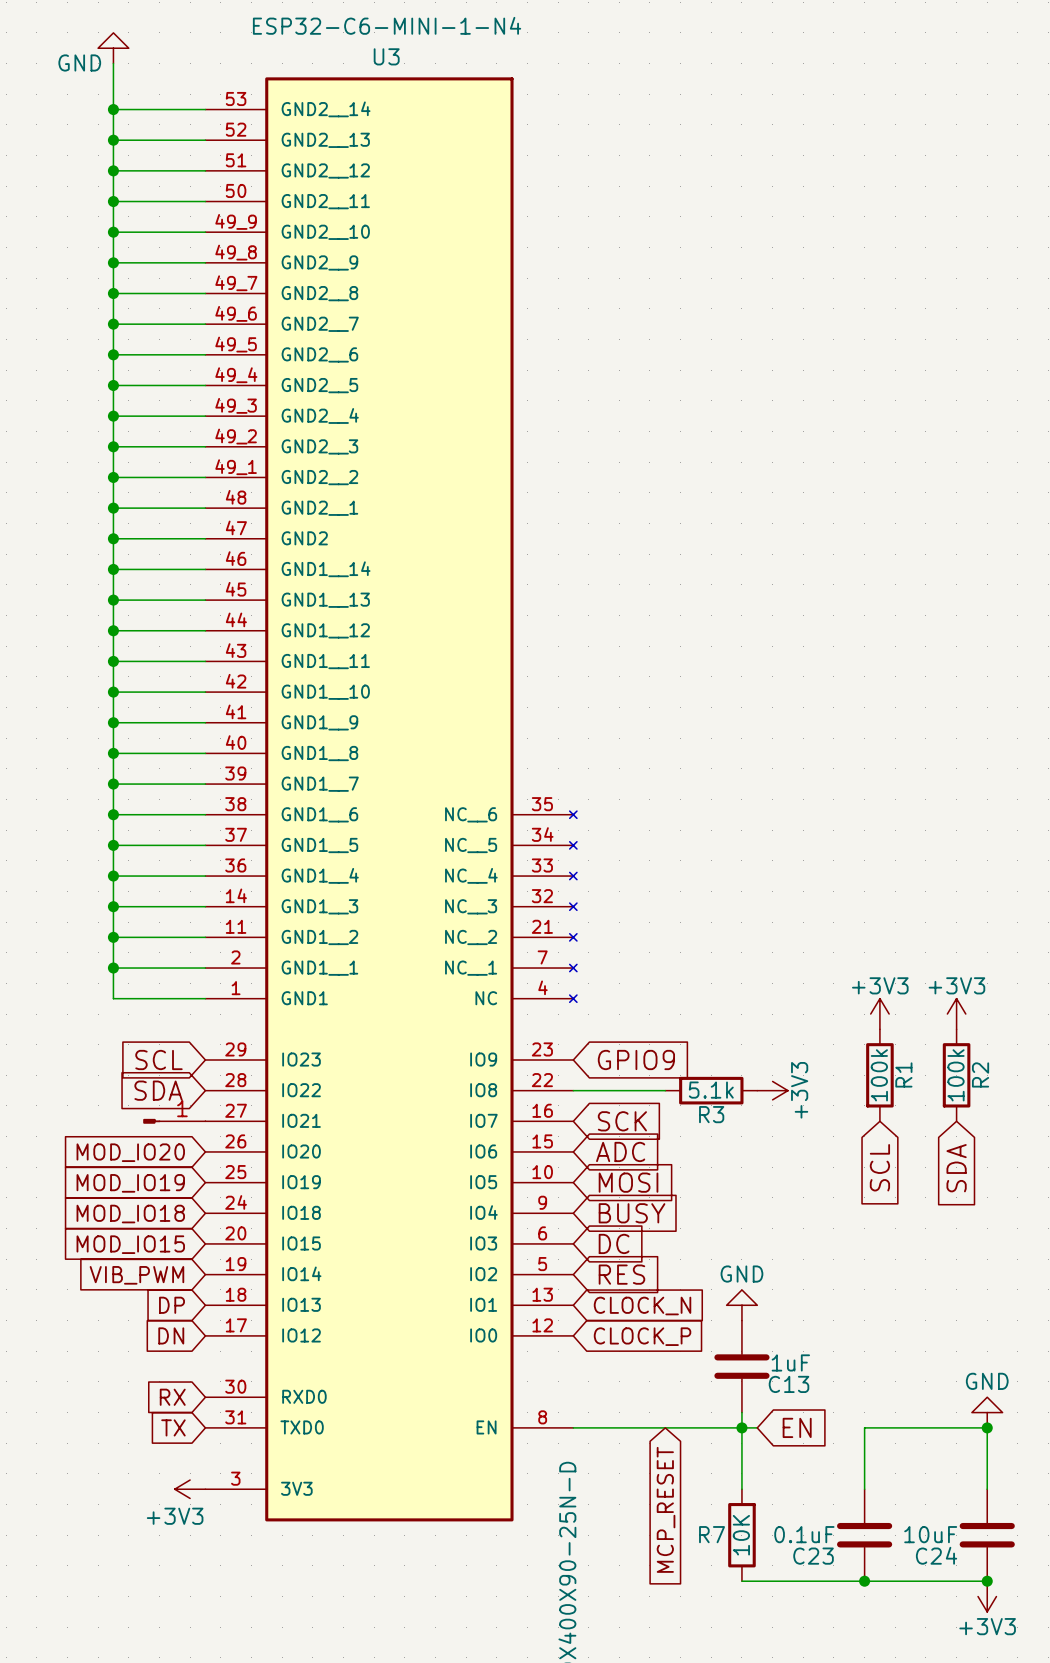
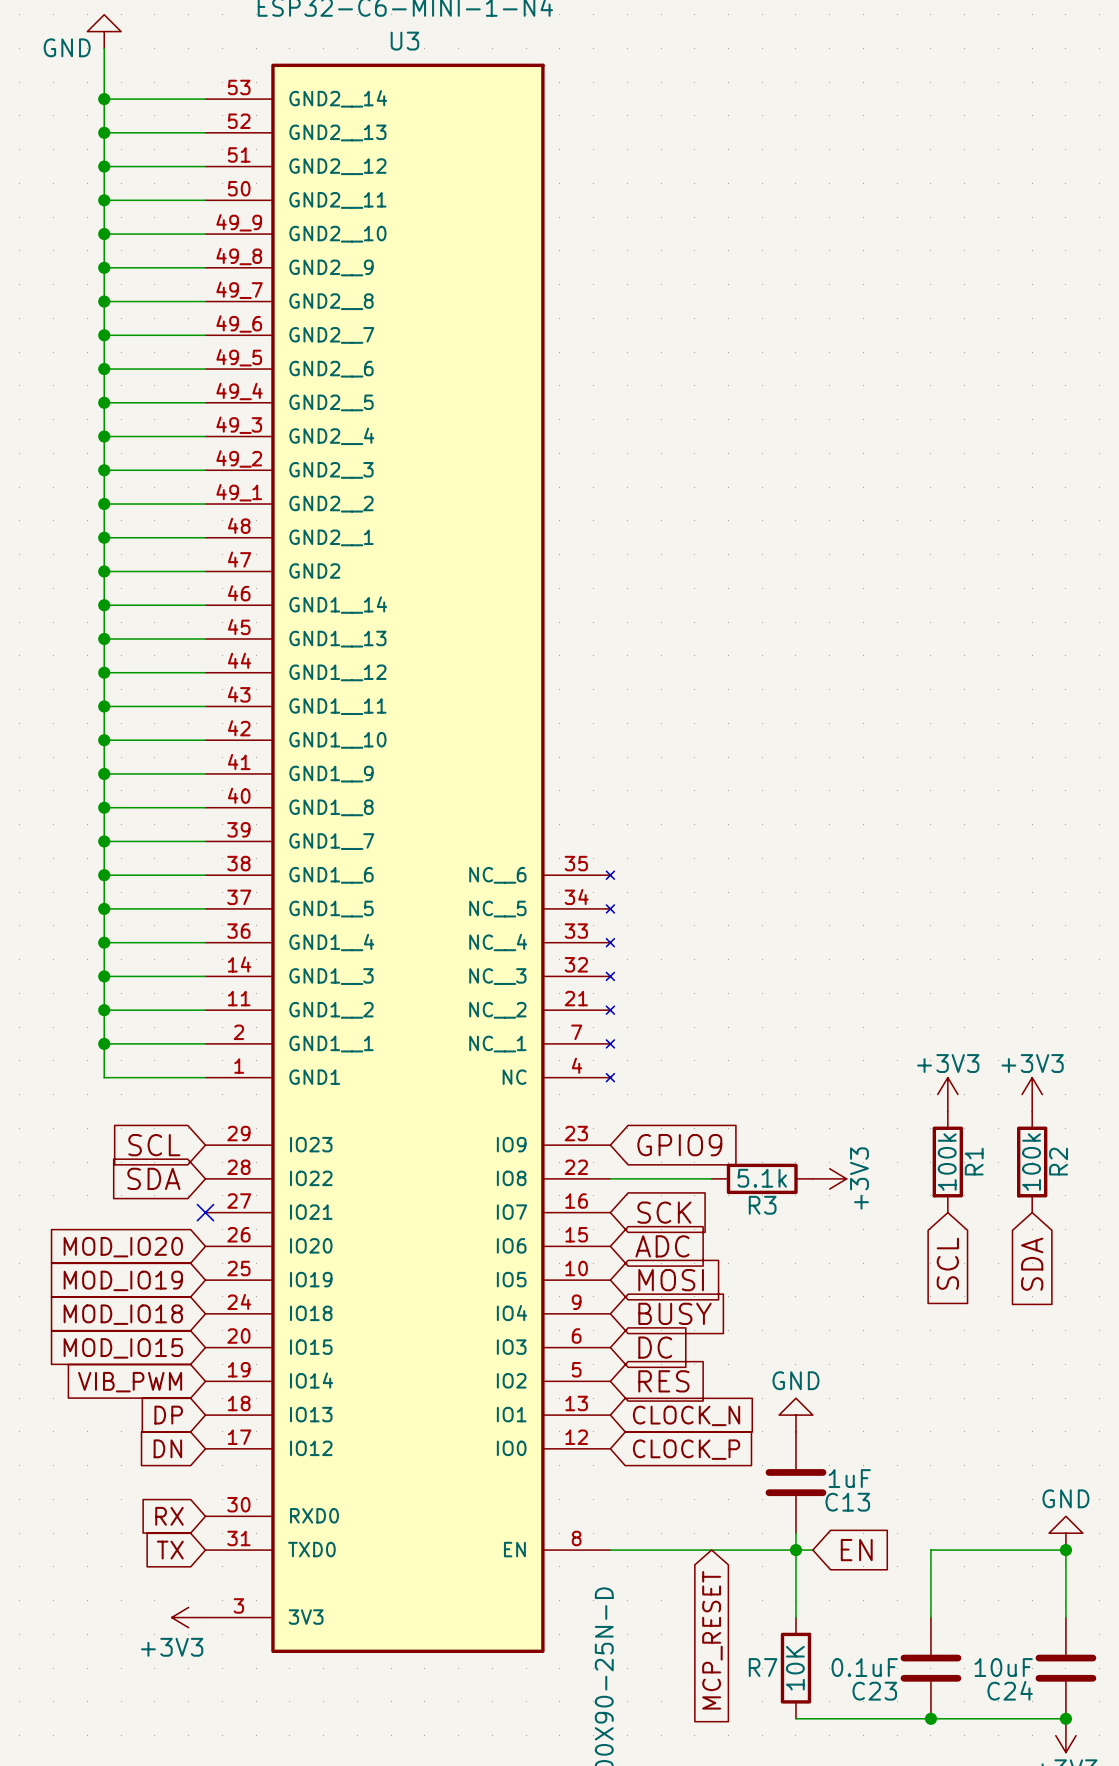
part: (174, 1121) -> none
no-connect mark: none -> (205, 1212)

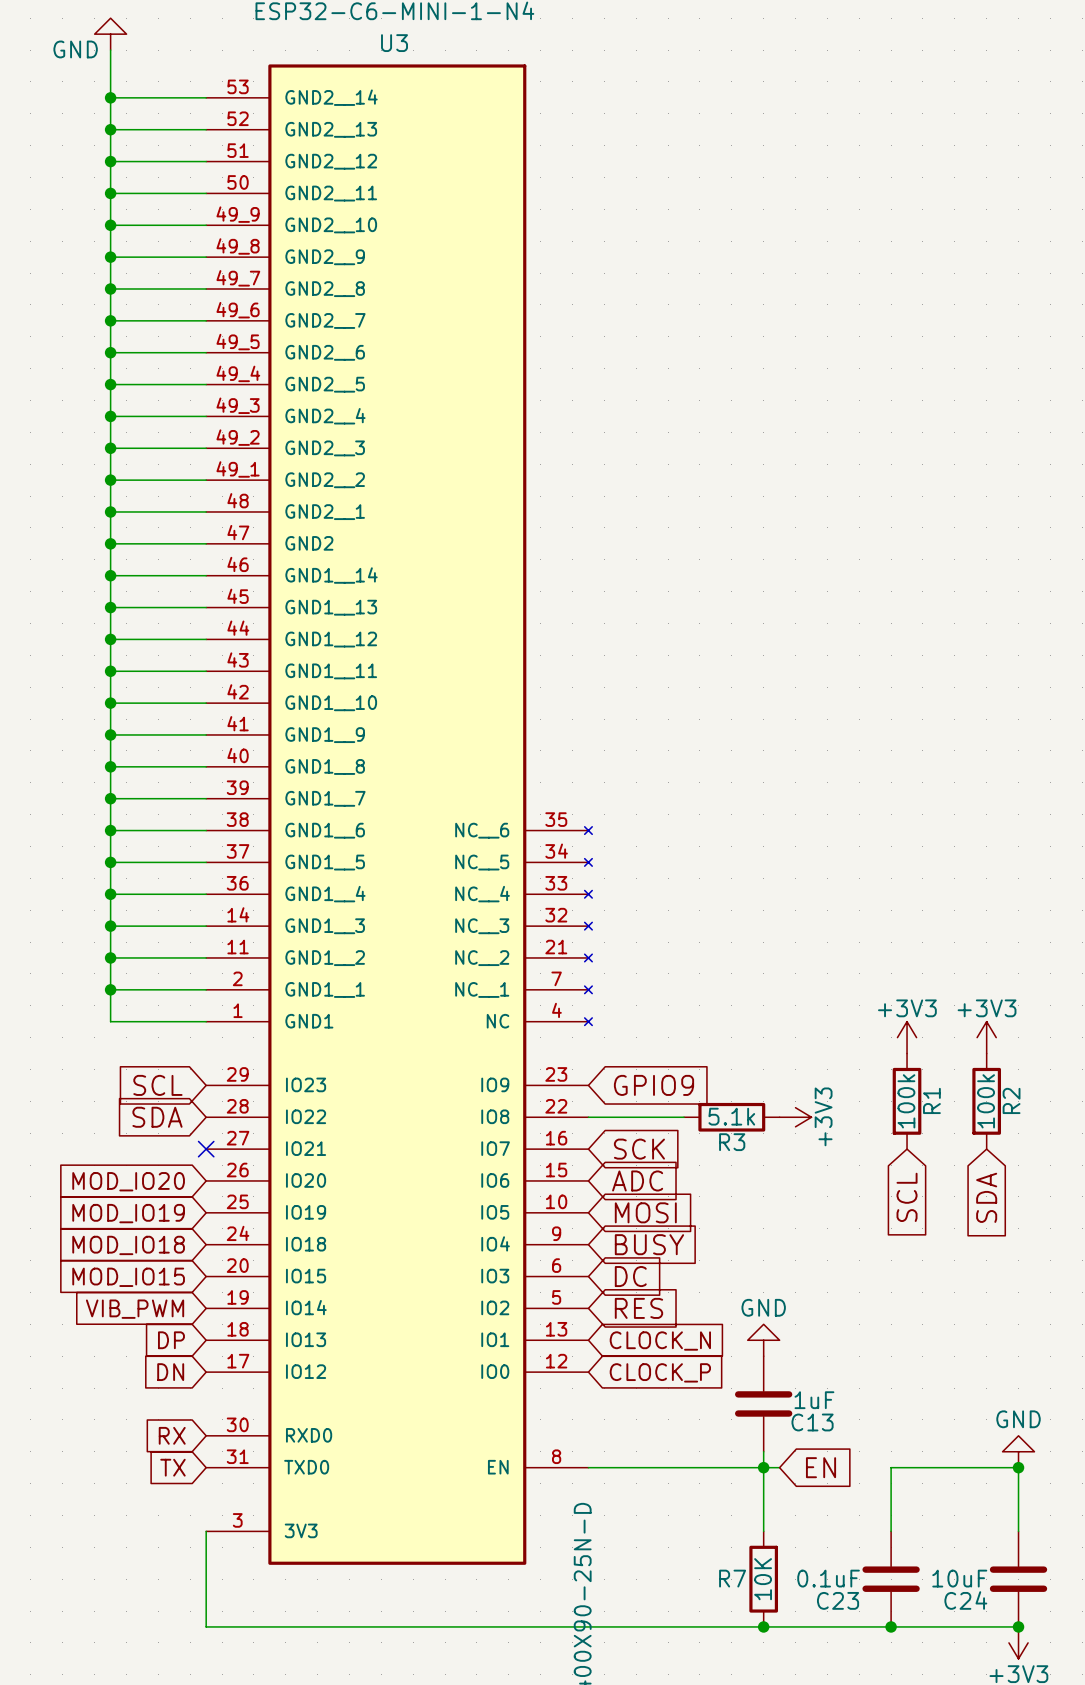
power symbol: +3V3 (188, 1617) -> none
wire: none -> (206, 1531) (206, 1626) (763, 1626)
global label: MCP_RESET (712, 1640) -> none
junction: none -> (763, 1626)

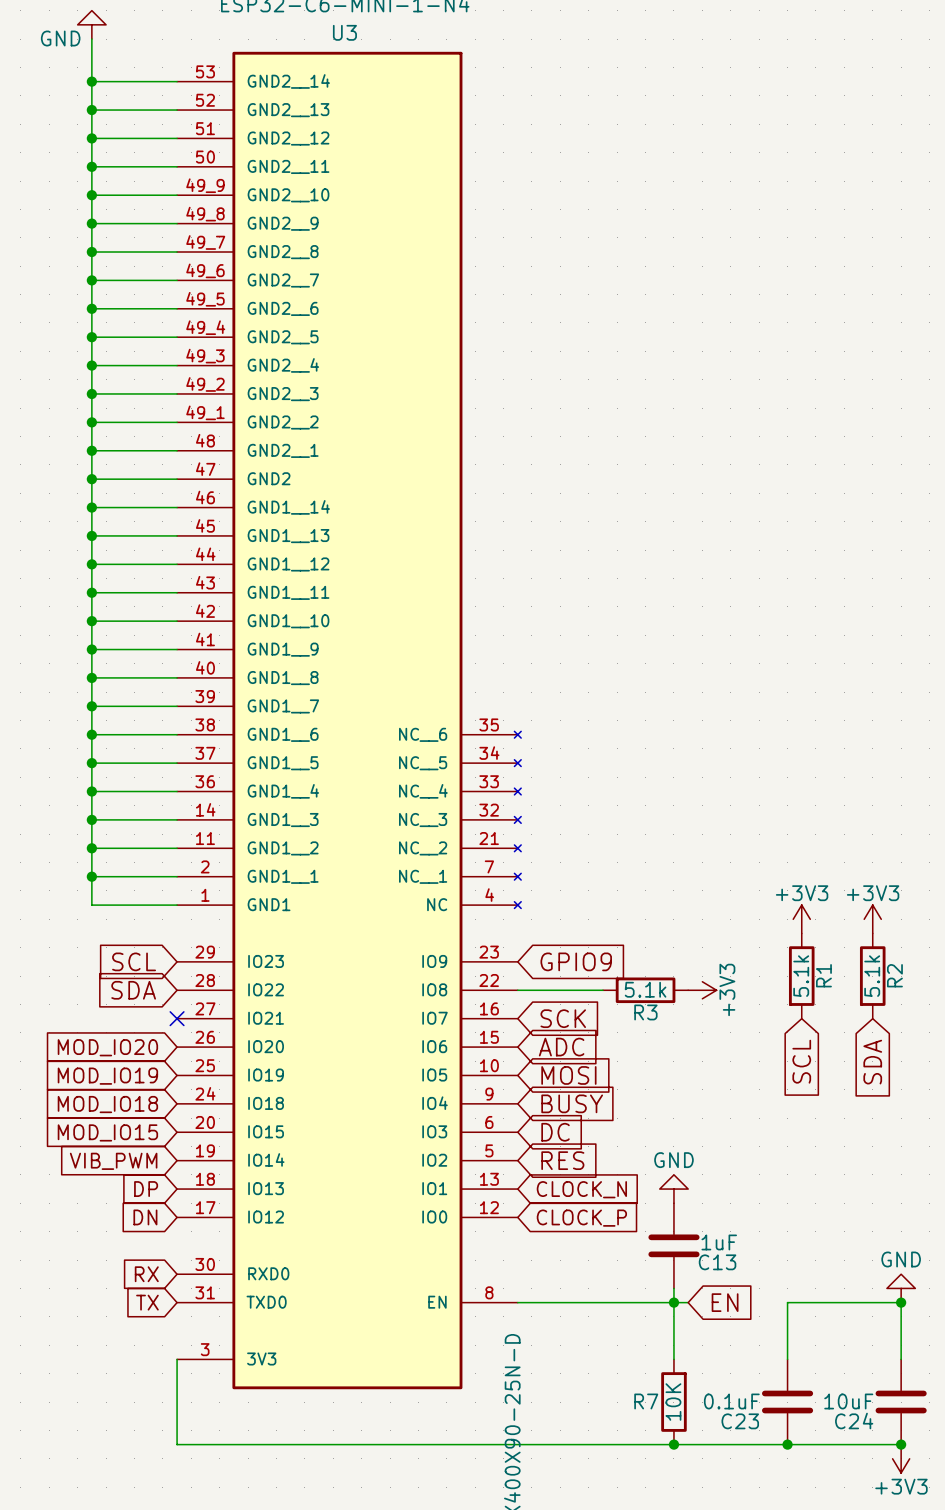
R1 value: 100k (906, 1101) -> 5.1k (801, 976)
R2 value: 100k (986, 1101) -> 5.1k (872, 976)

